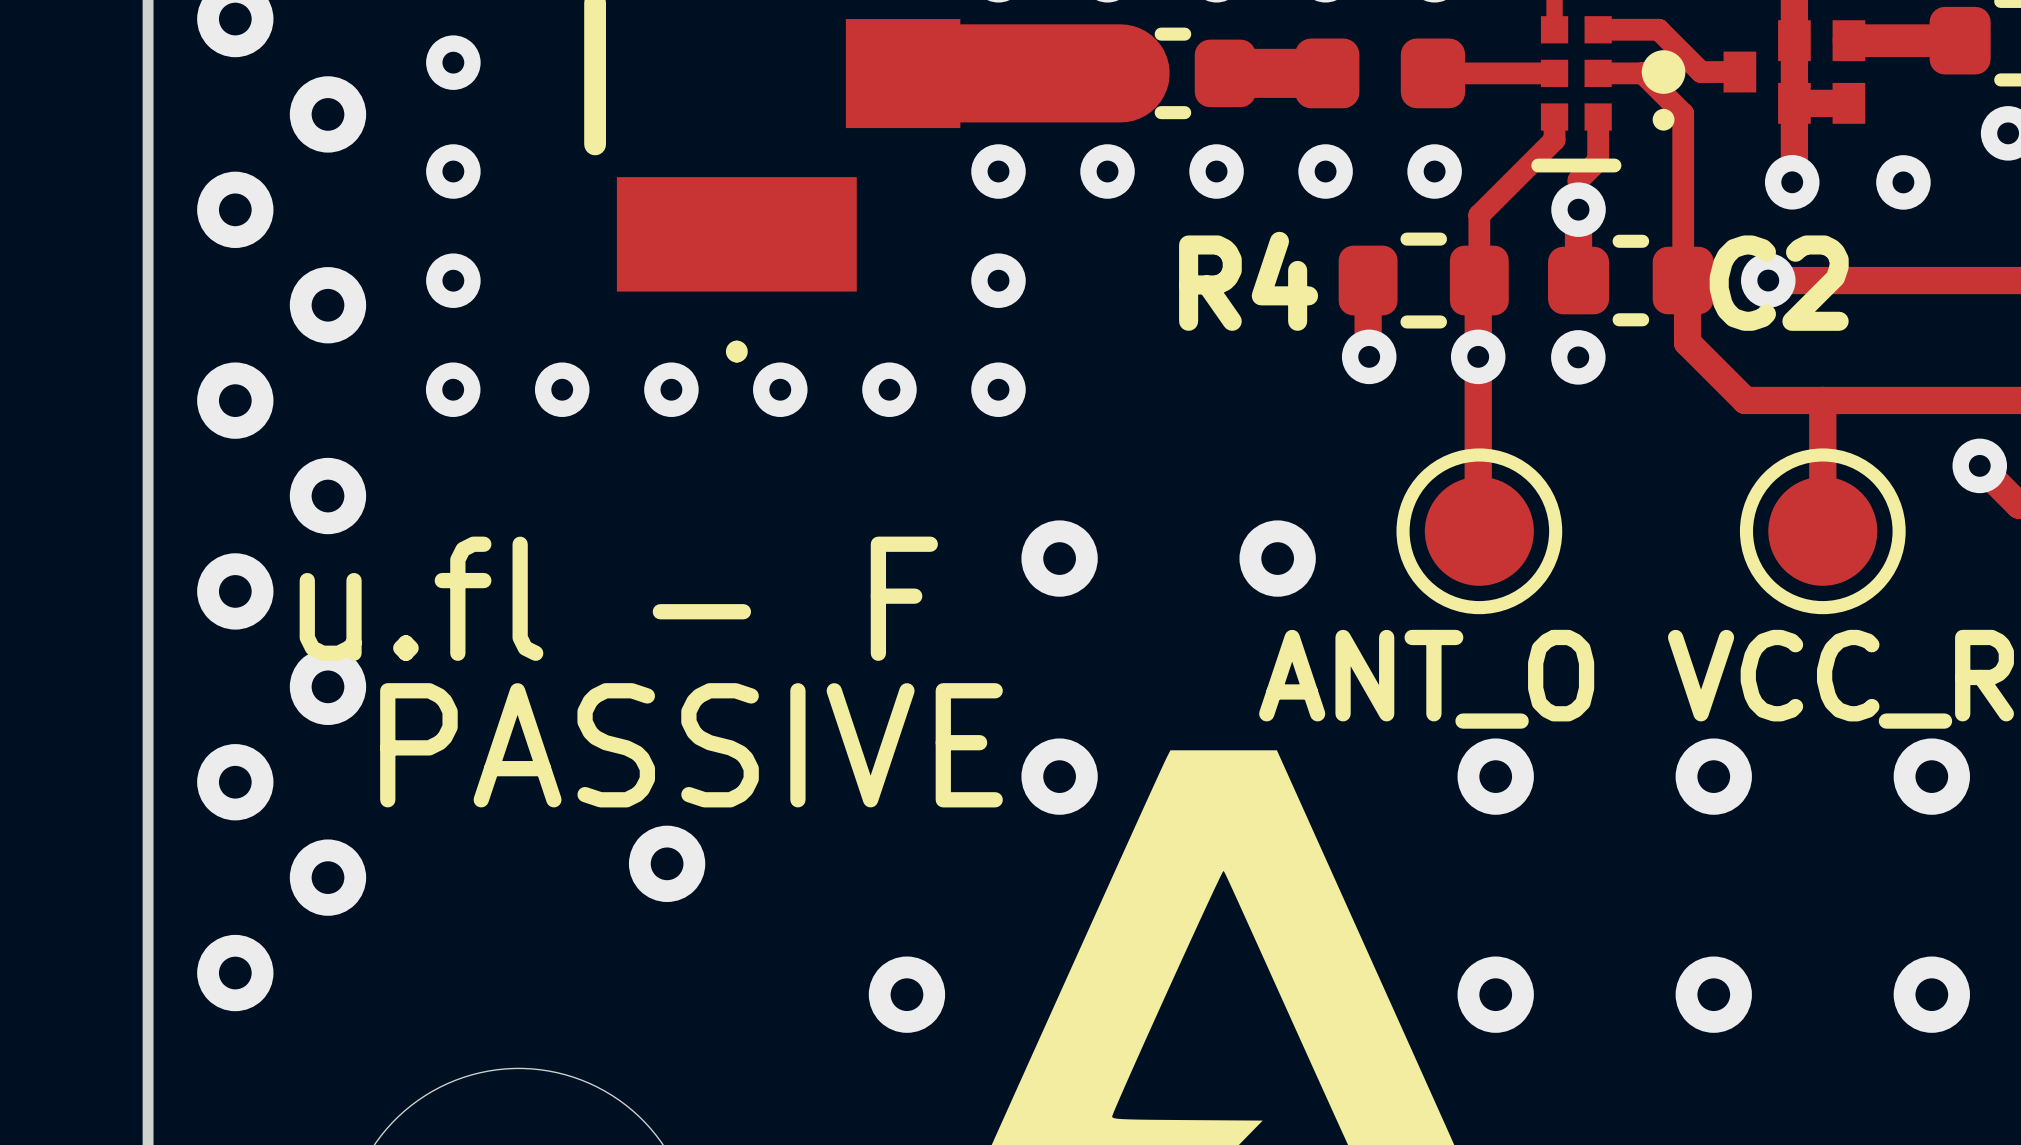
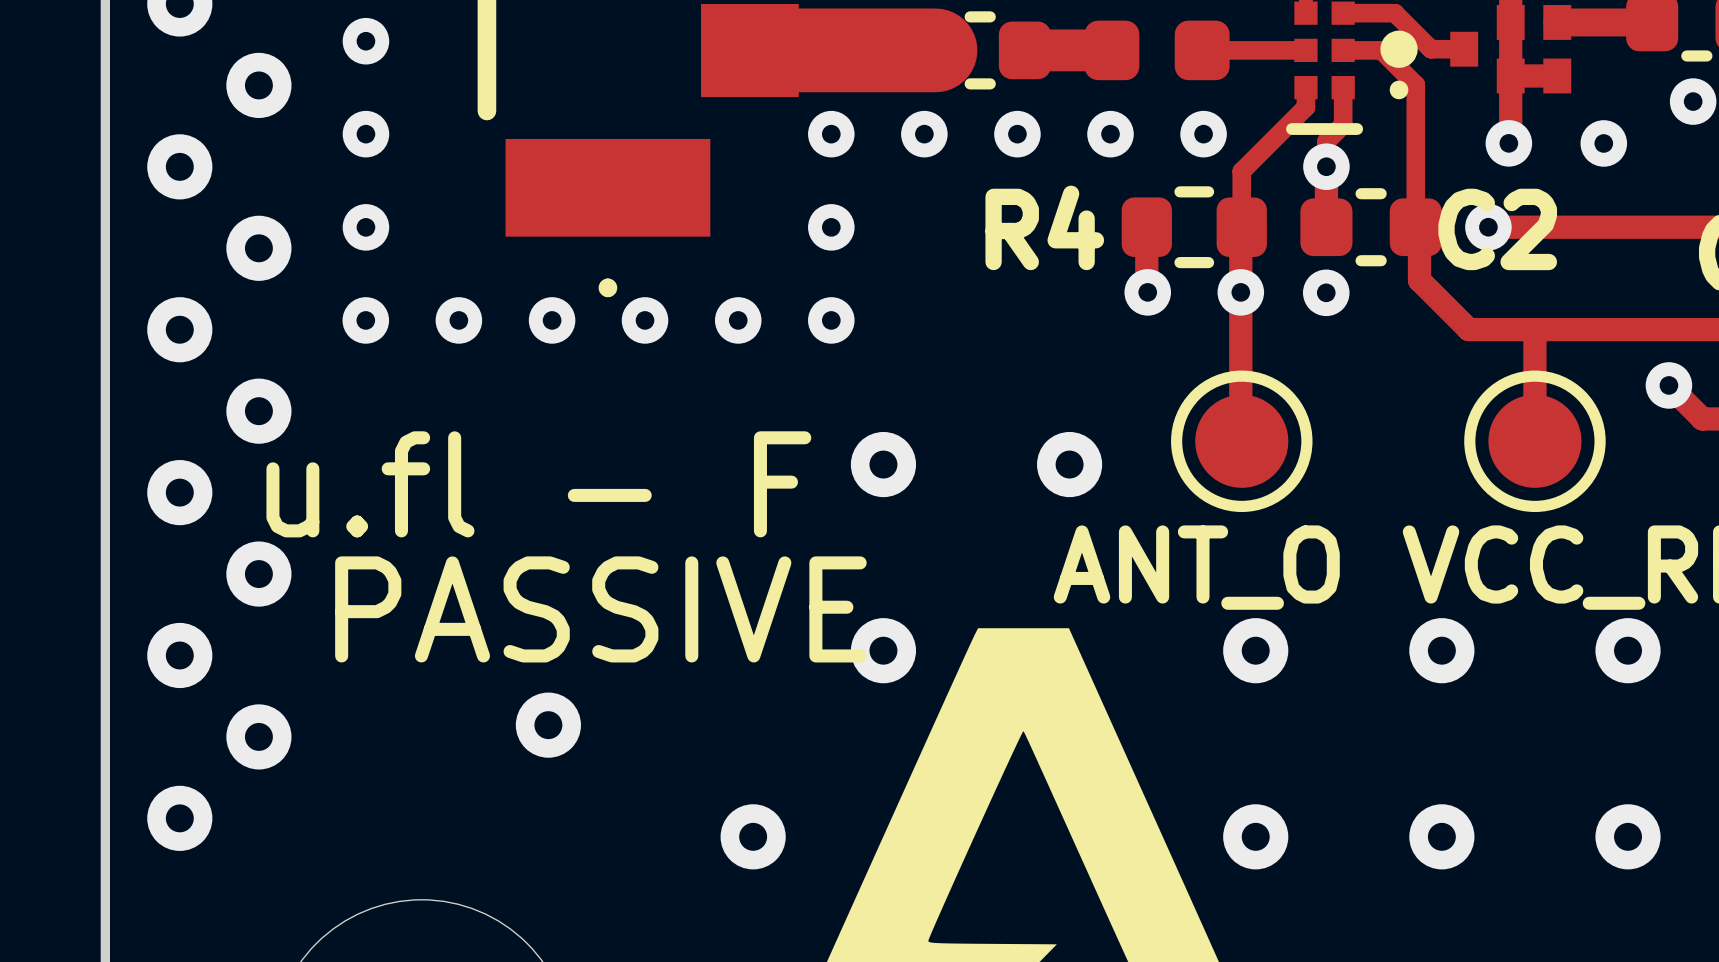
text position: u.fl - F (618, 598) -> u.fl - F (538, 484)
text position: PASSIVE (691, 745) -> PASSIVE (600, 609)

